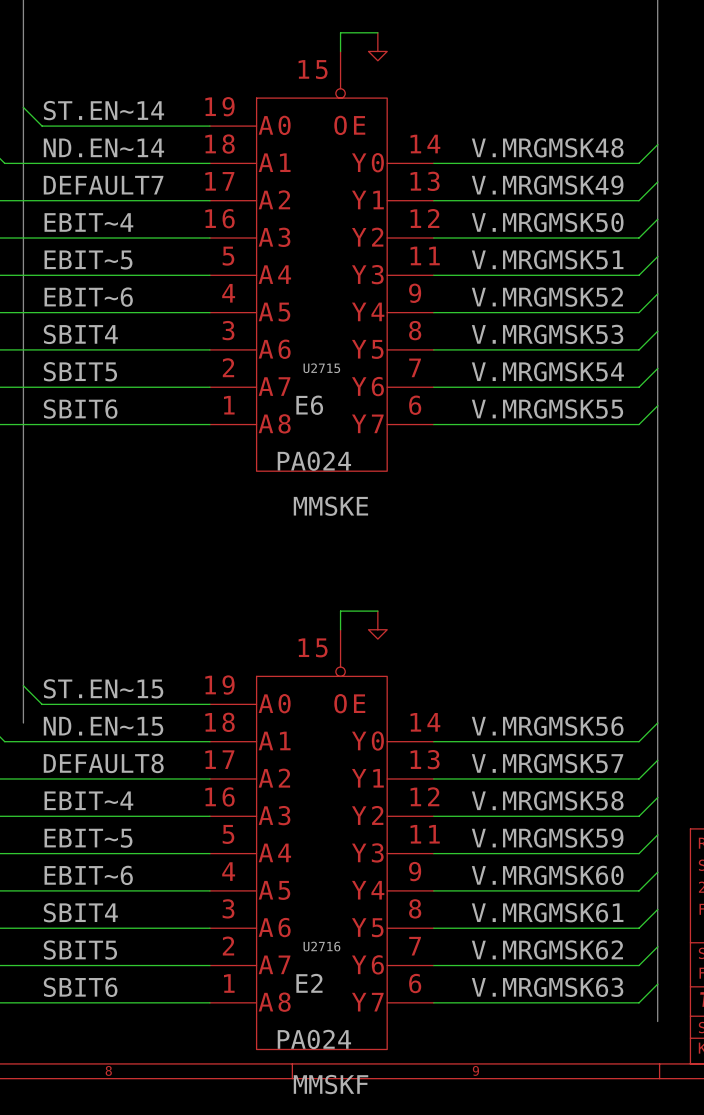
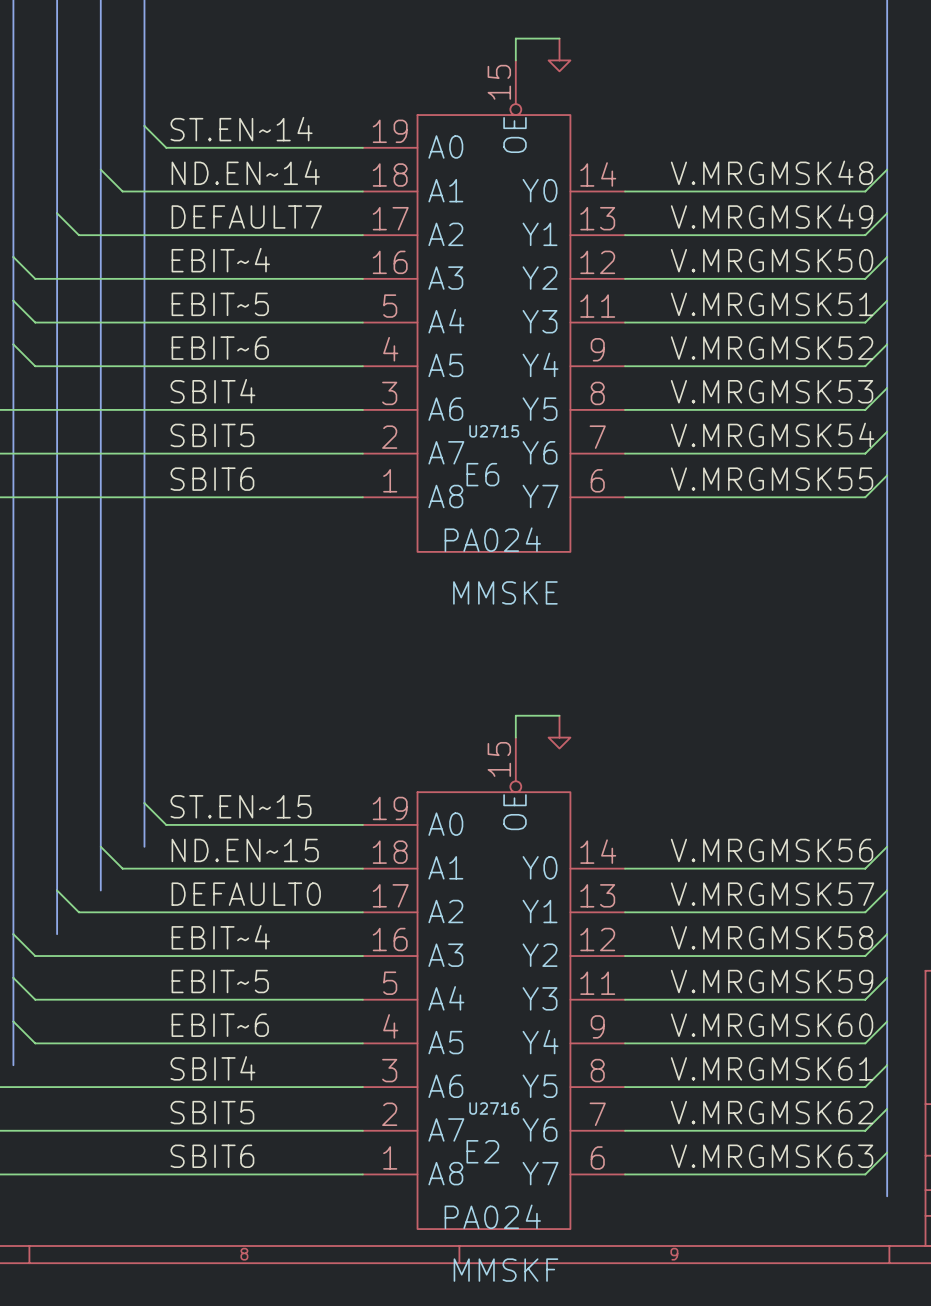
U2715 symbol: [209, 51, 434, 472] -> [362, 60, 626, 552]
U2716 symbol: [209, 629, 434, 1050] -> [362, 737, 626, 1230]
label: DEFAULT8 (103, 763) -> DEFAULT0 (246, 894)

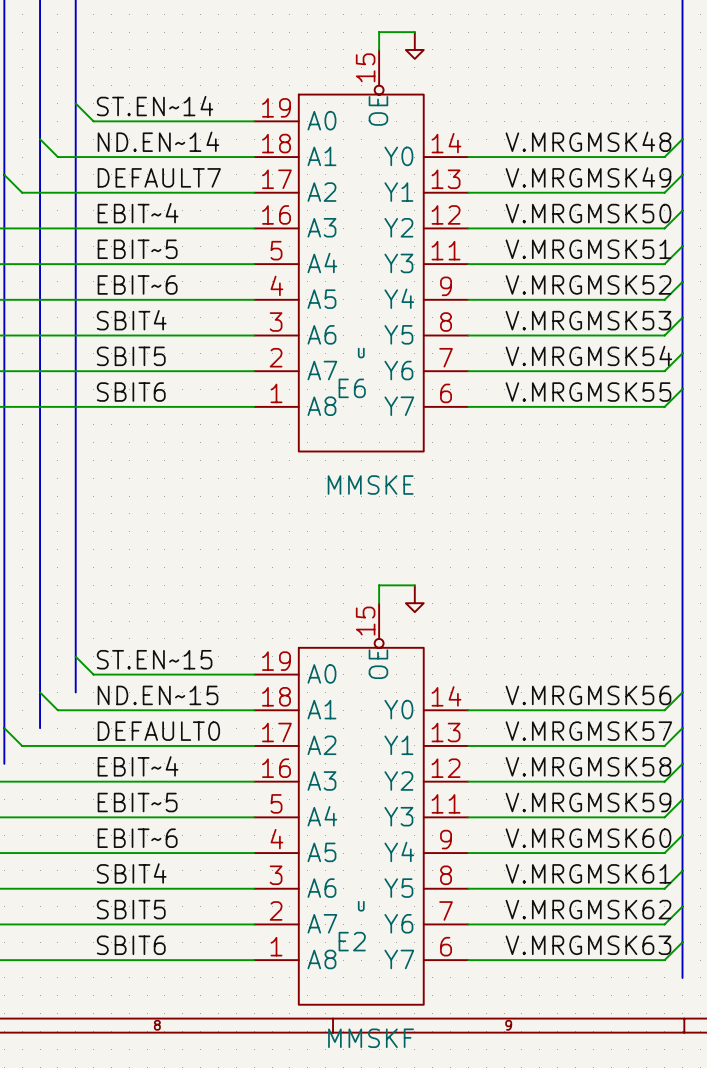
U2715 name: U2715 (494, 431) -> U (361, 353)
U2715 value: PA024 (492, 539) -> none
U2716 name: U2716 (494, 1108) -> U (361, 906)
U2716 value: PA024 (492, 1216) -> none

